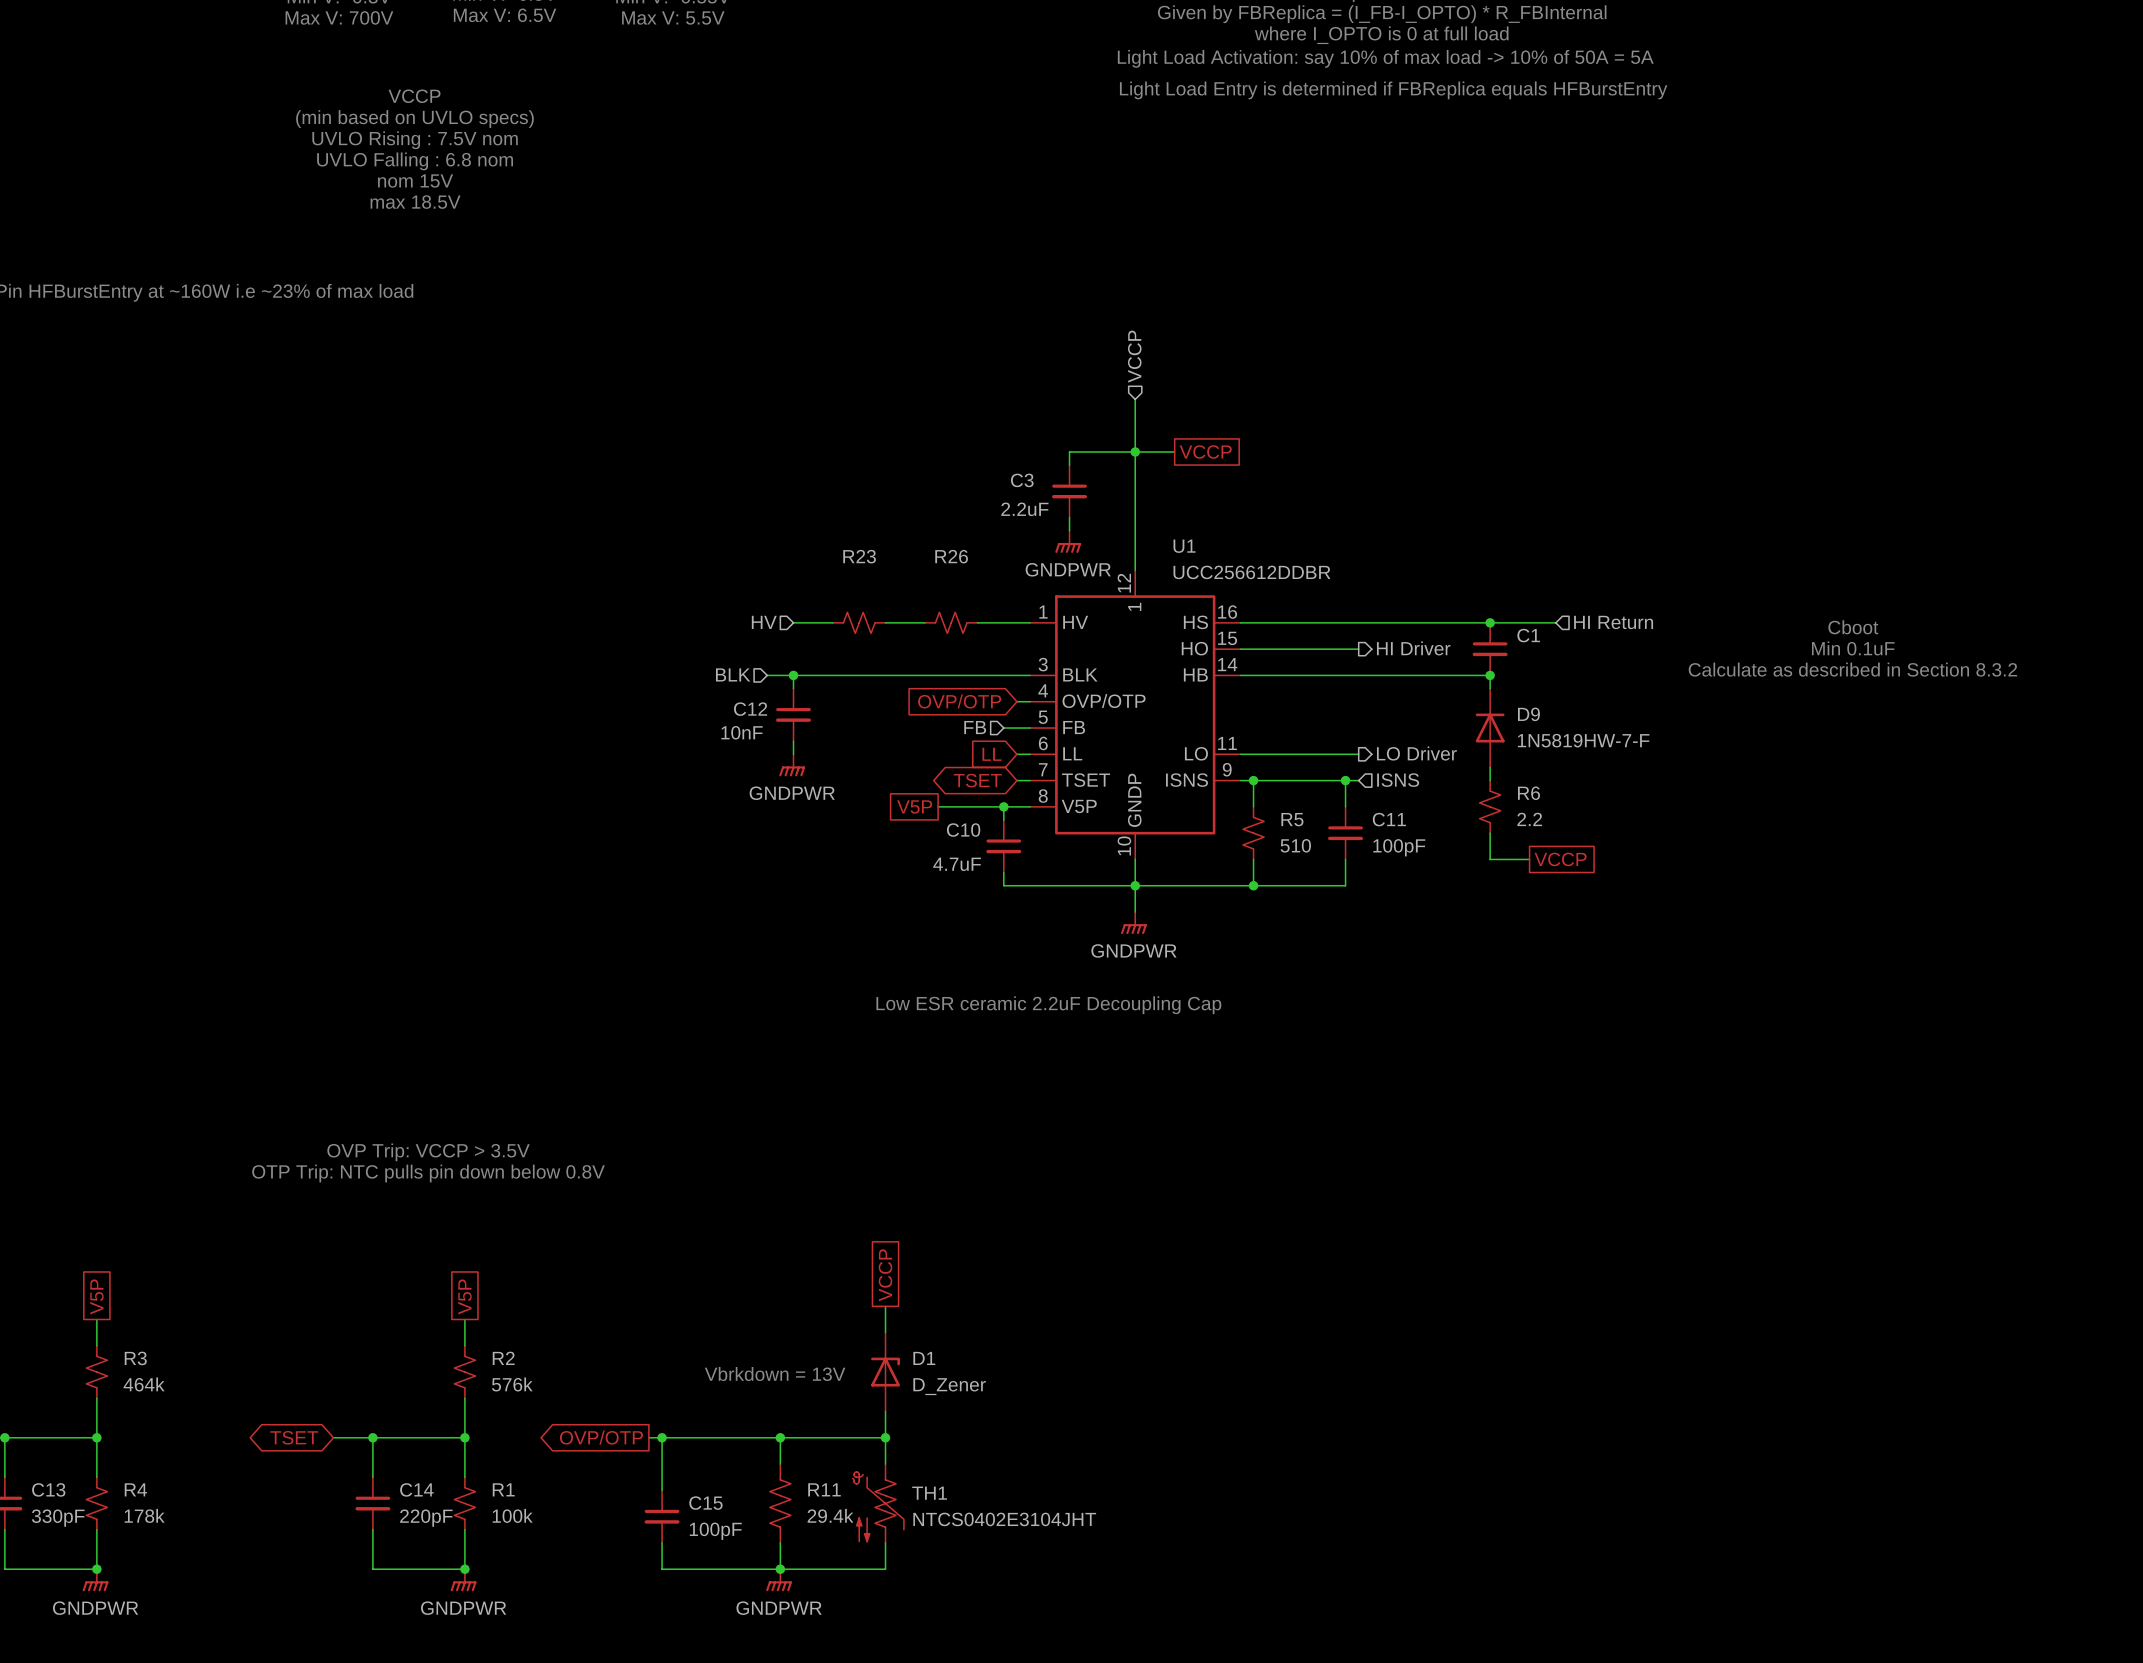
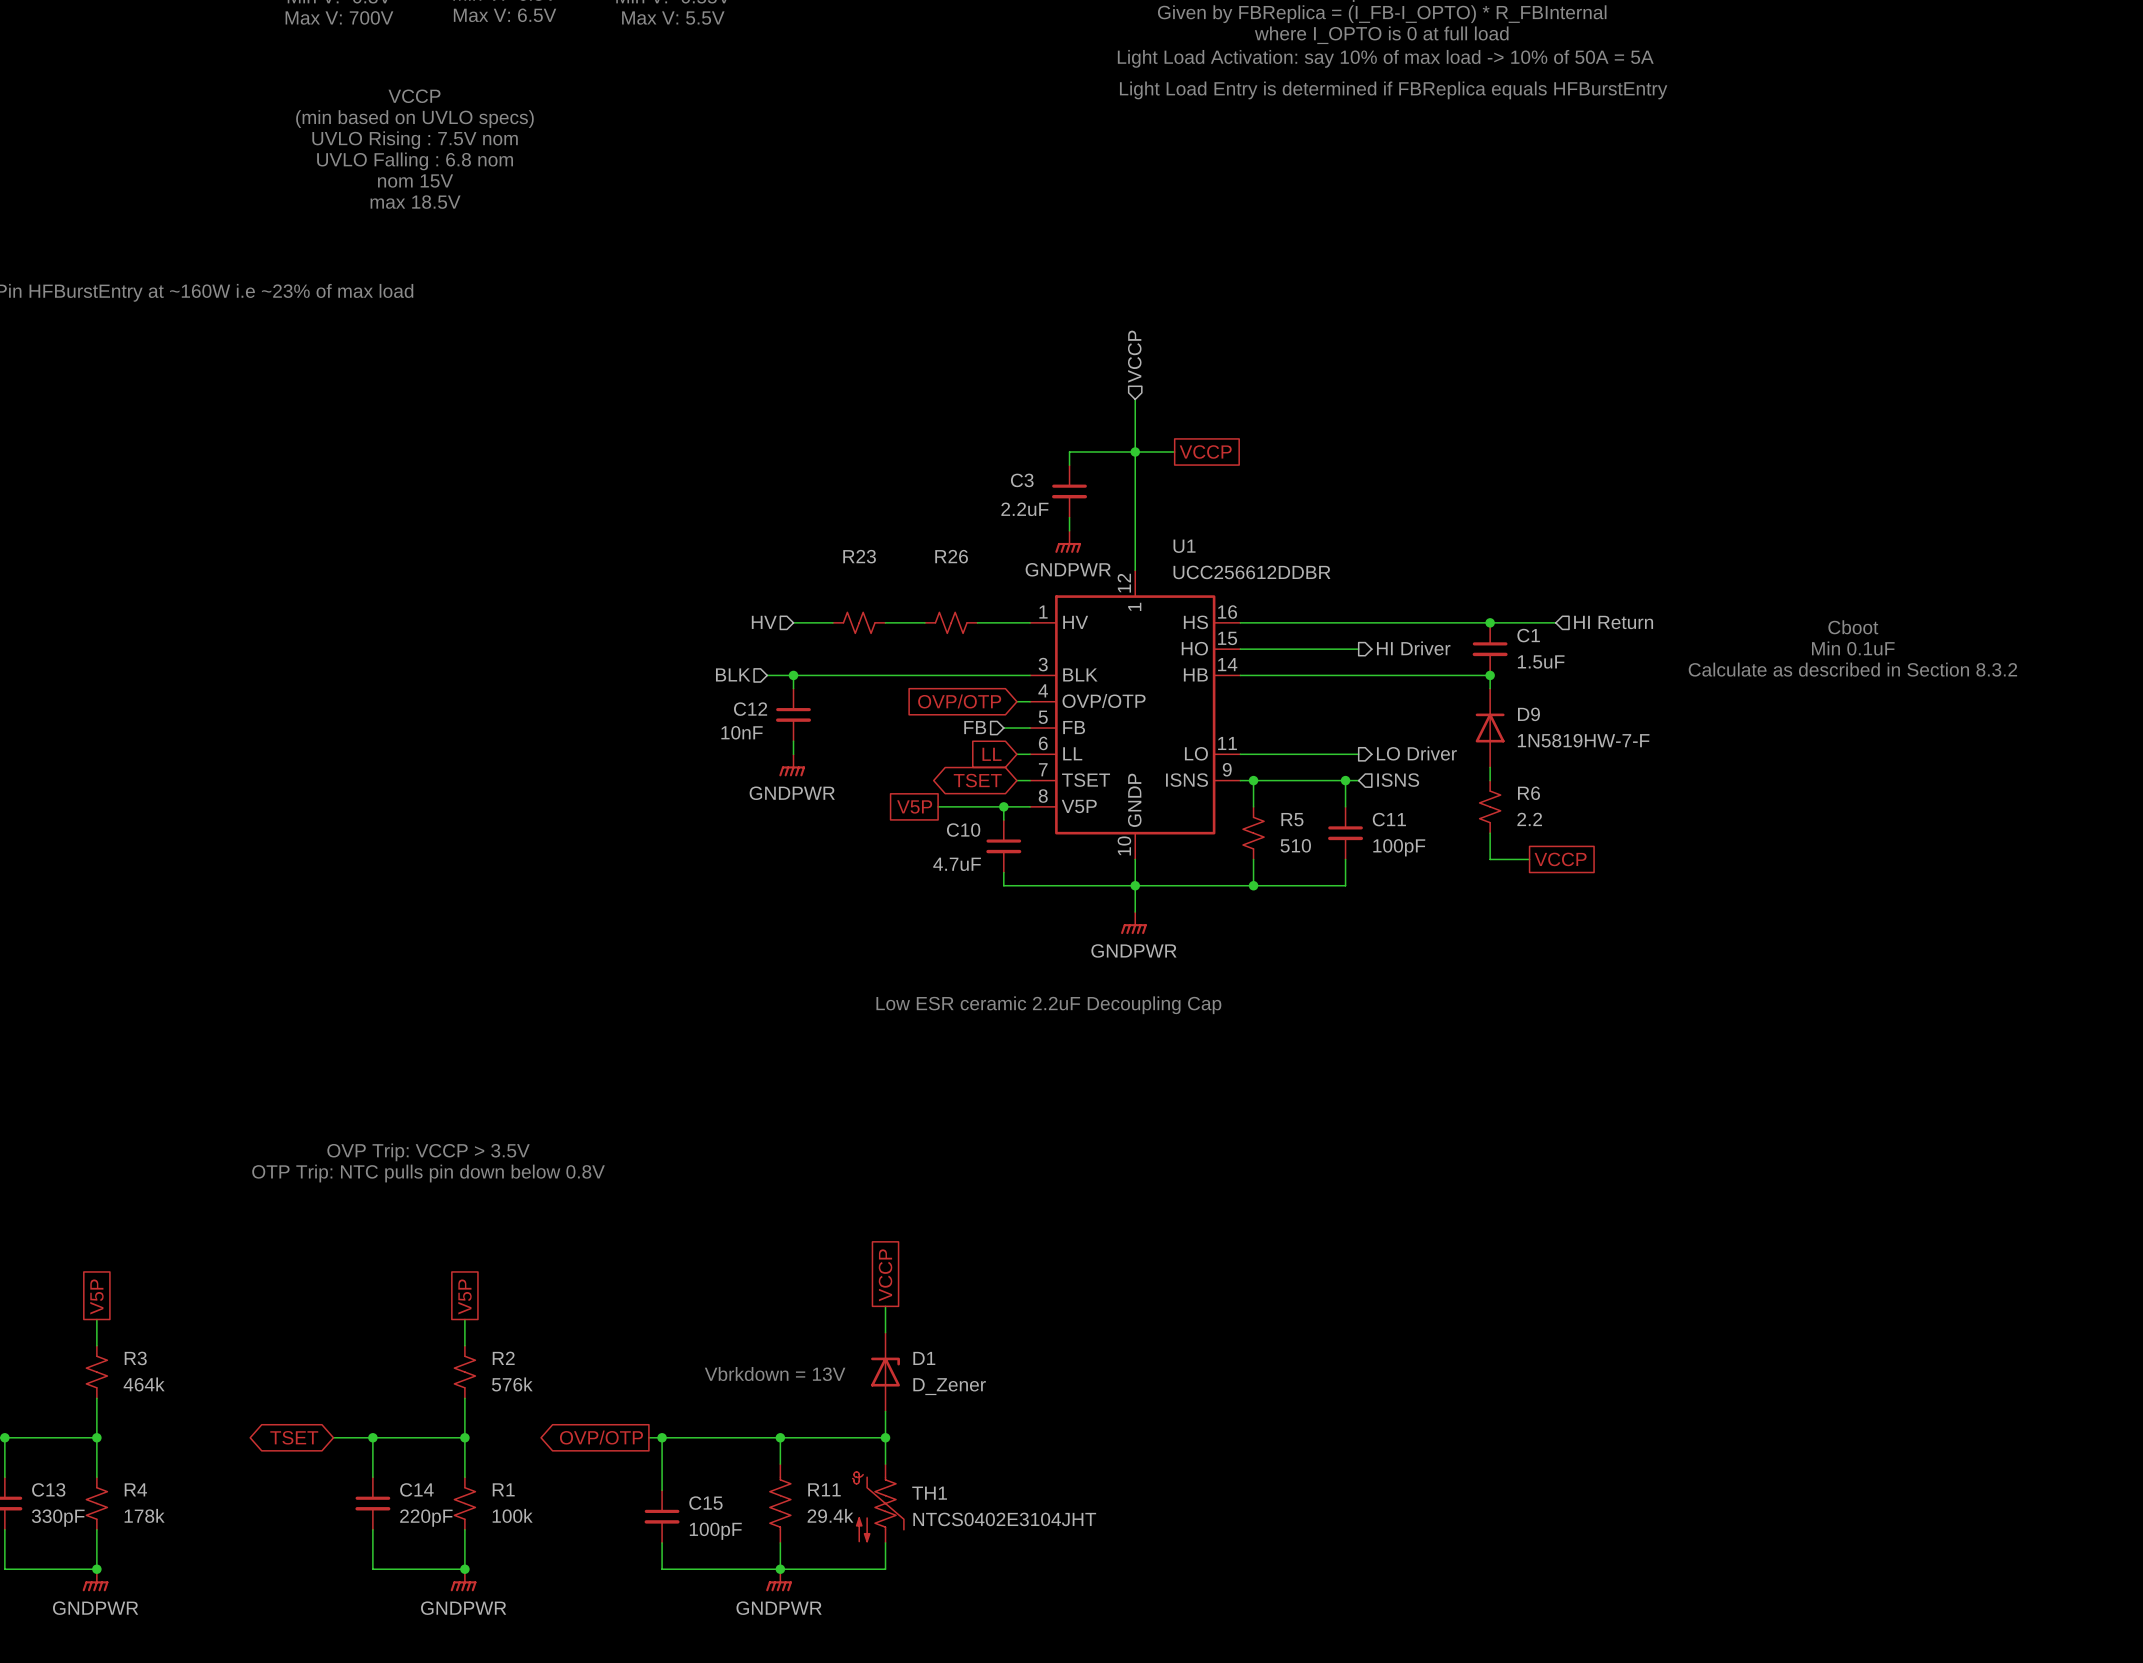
C1 value: none -> 1.5uF (1541, 661)

